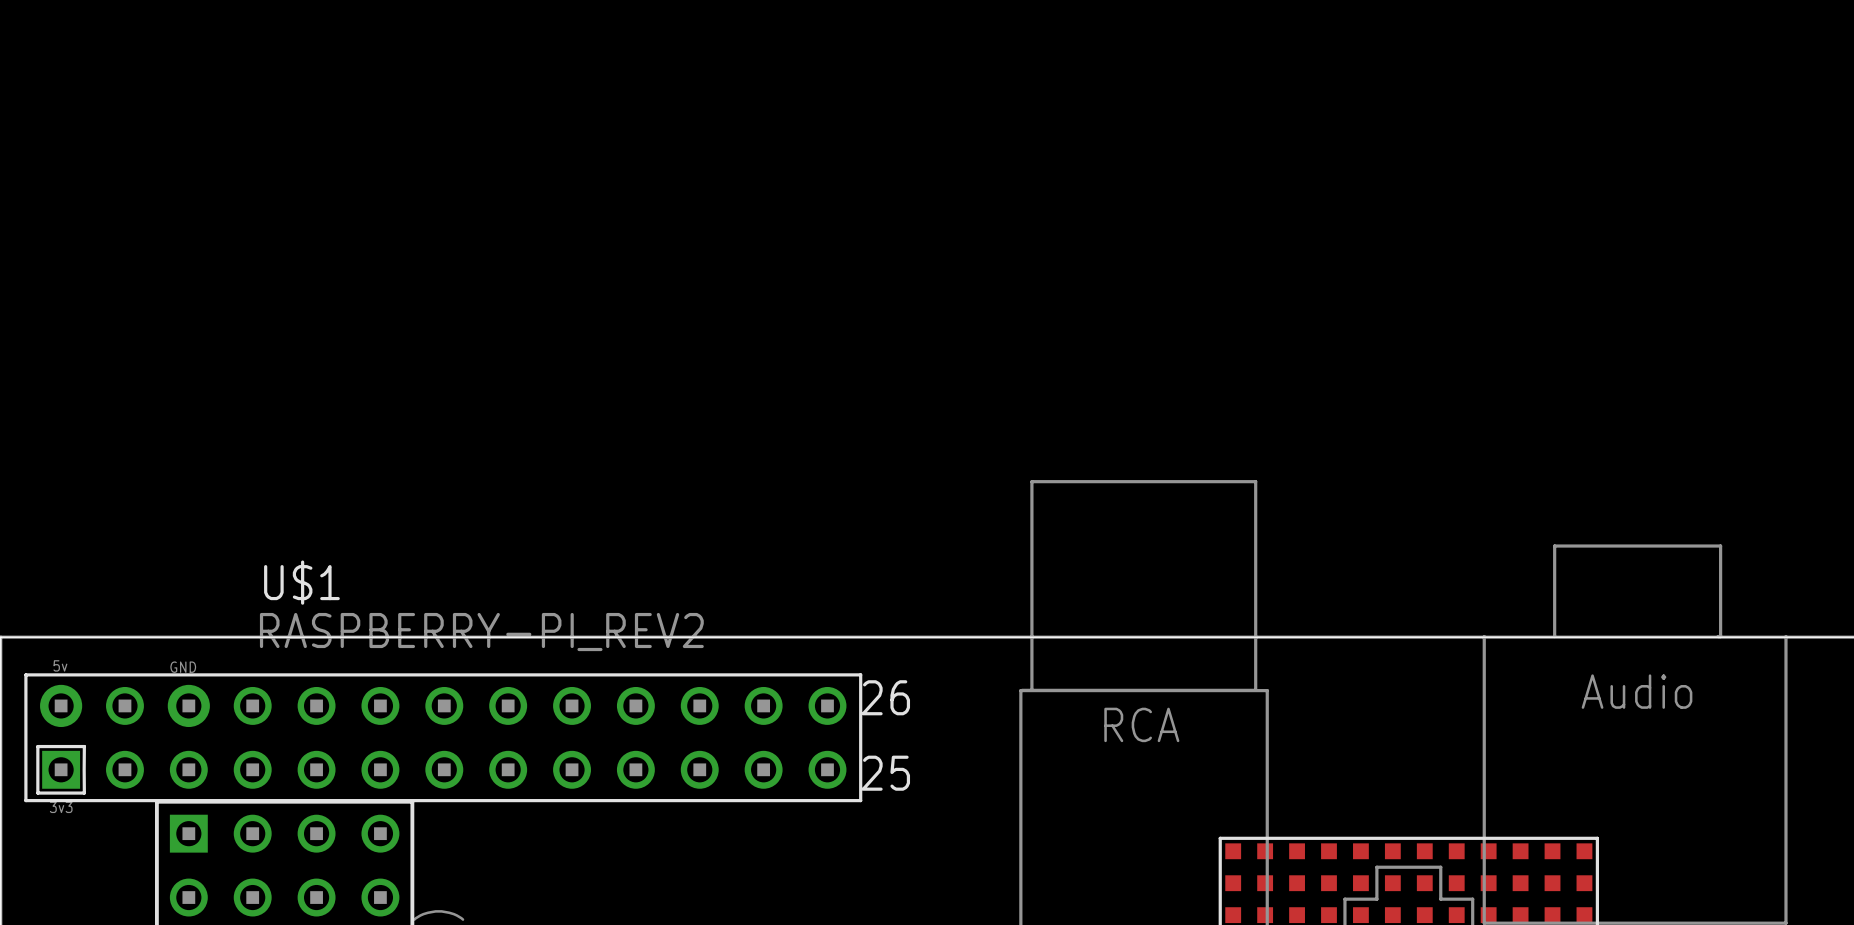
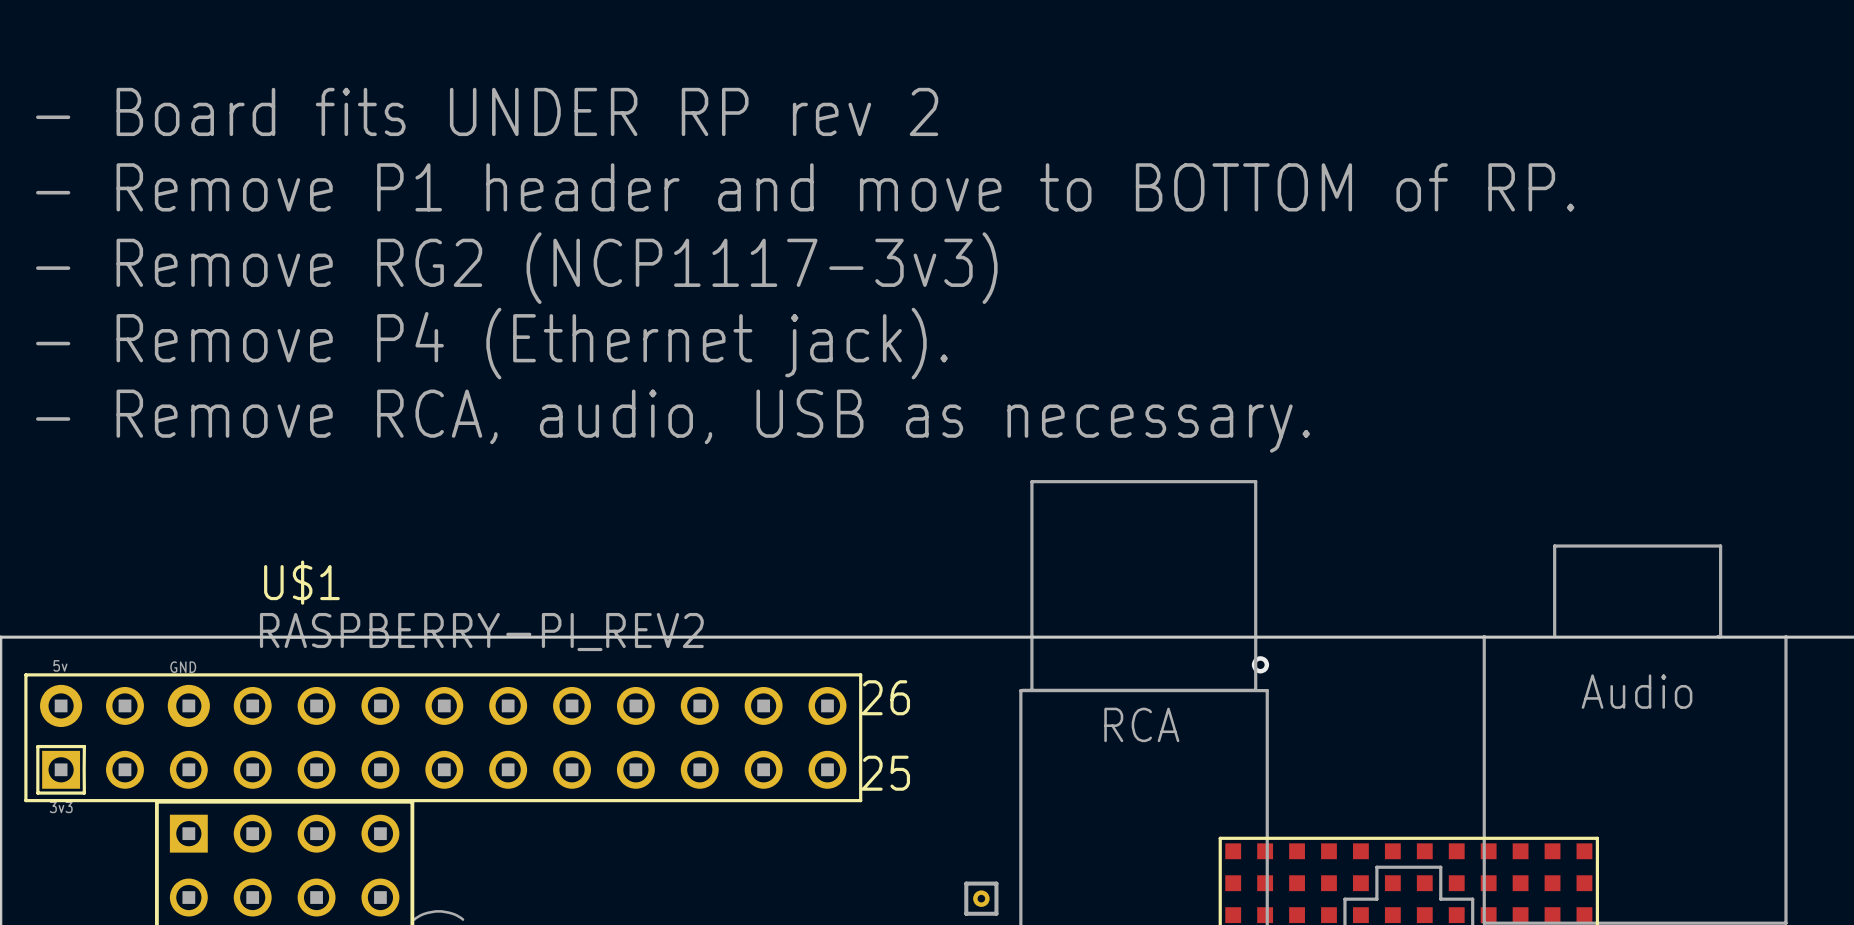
text: none -> - Board fits UNDER RP rev 2 (487, 111)
text: none -> - Remove P1 header and move to BOTTOM of RP. (805, 187)
text: none -> - Remove RG2 (NCP1117-3v3) (516, 268)
text: none -> - Remove P4 (Ethernet jack). (491, 343)
text: none -> - Remove RCA, audio, USB as necessary. (672, 421)
via: none -> (1260, 664)
part: none -> (981, 898)

